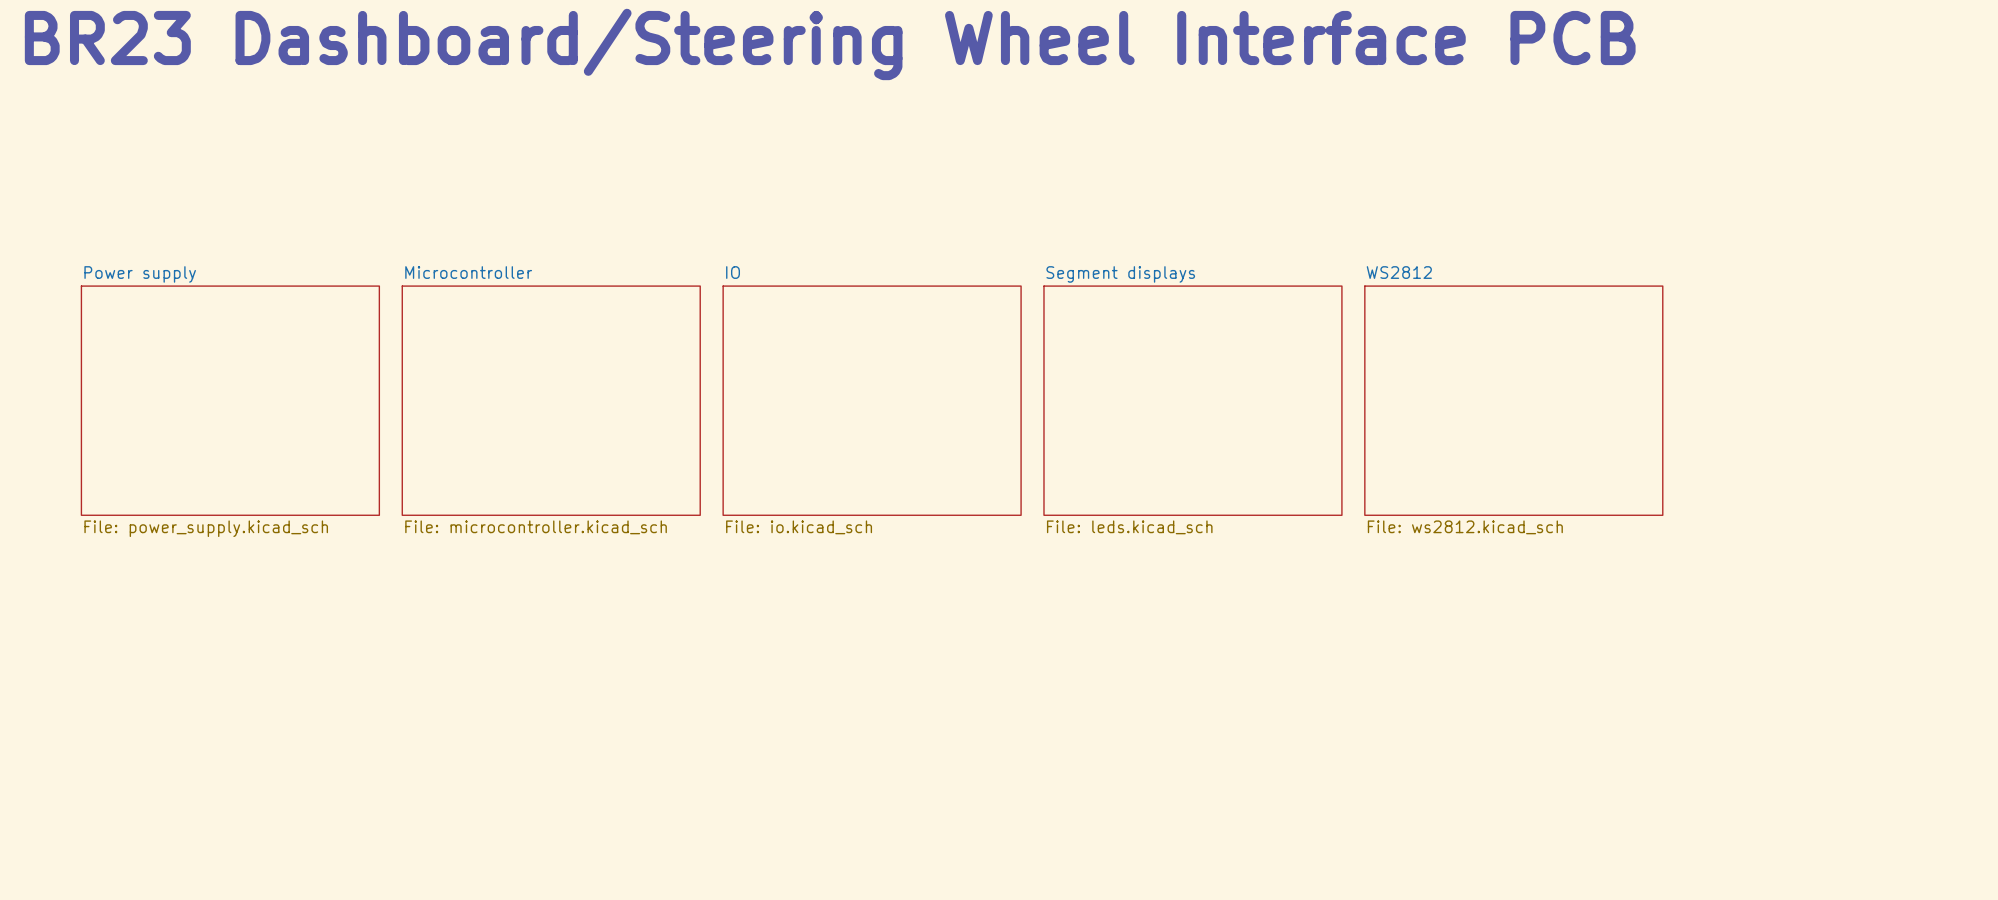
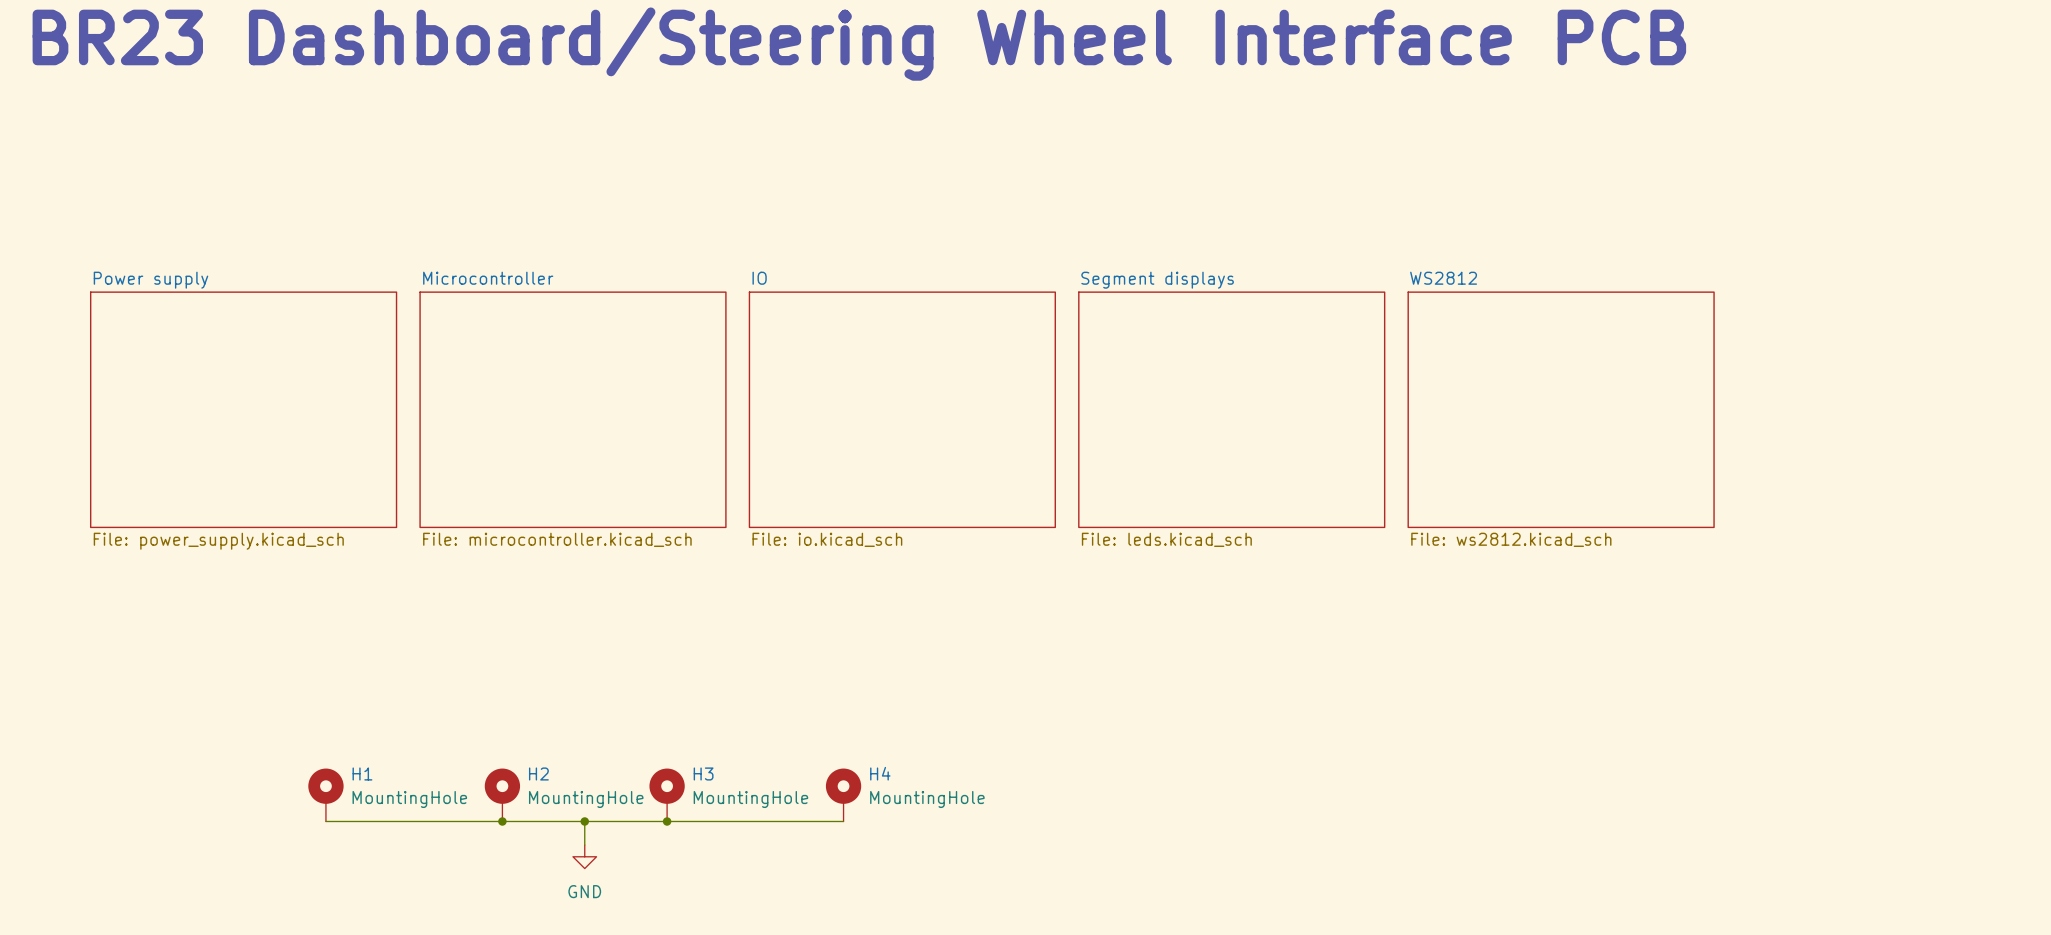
H1: none -> MountingHole (325, 795)
H2: none -> MountingHole (502, 795)
H3: none -> MountingHole (667, 795)
H4: none -> MountingHole (843, 795)
wire: none -> (325, 821) (843, 821)
junction: none -> (502, 821)
wire: none -> (584, 821) (584, 845)
junction: none -> (584, 821)
junction: none -> (667, 821)
power symbol: none -> GND (584, 856)

